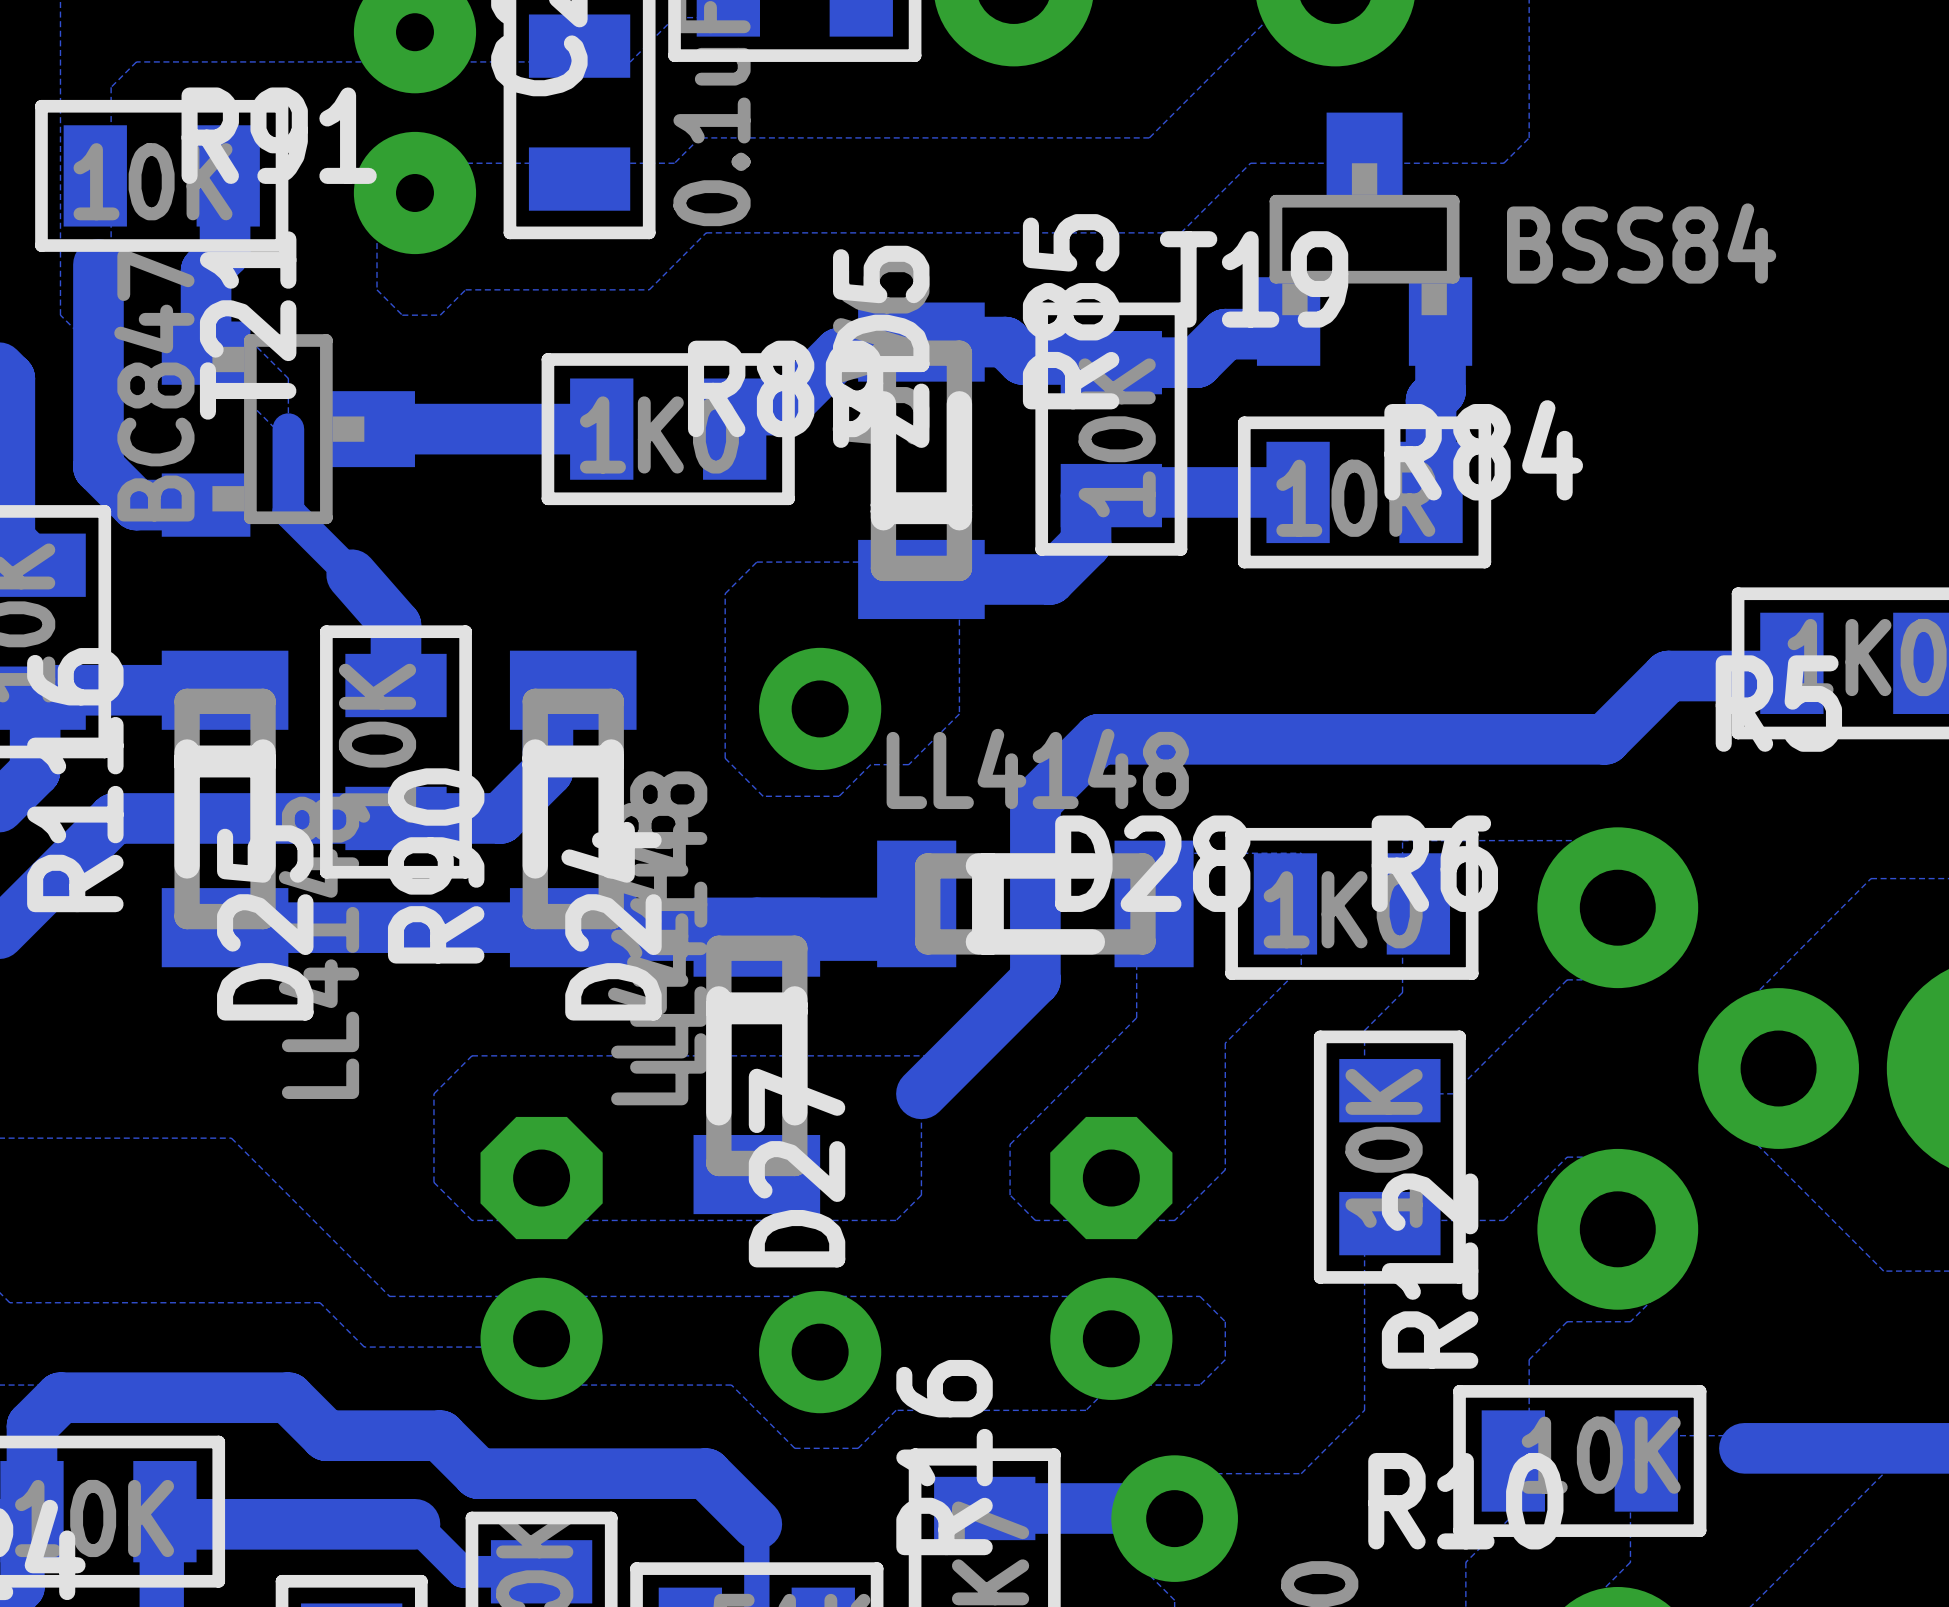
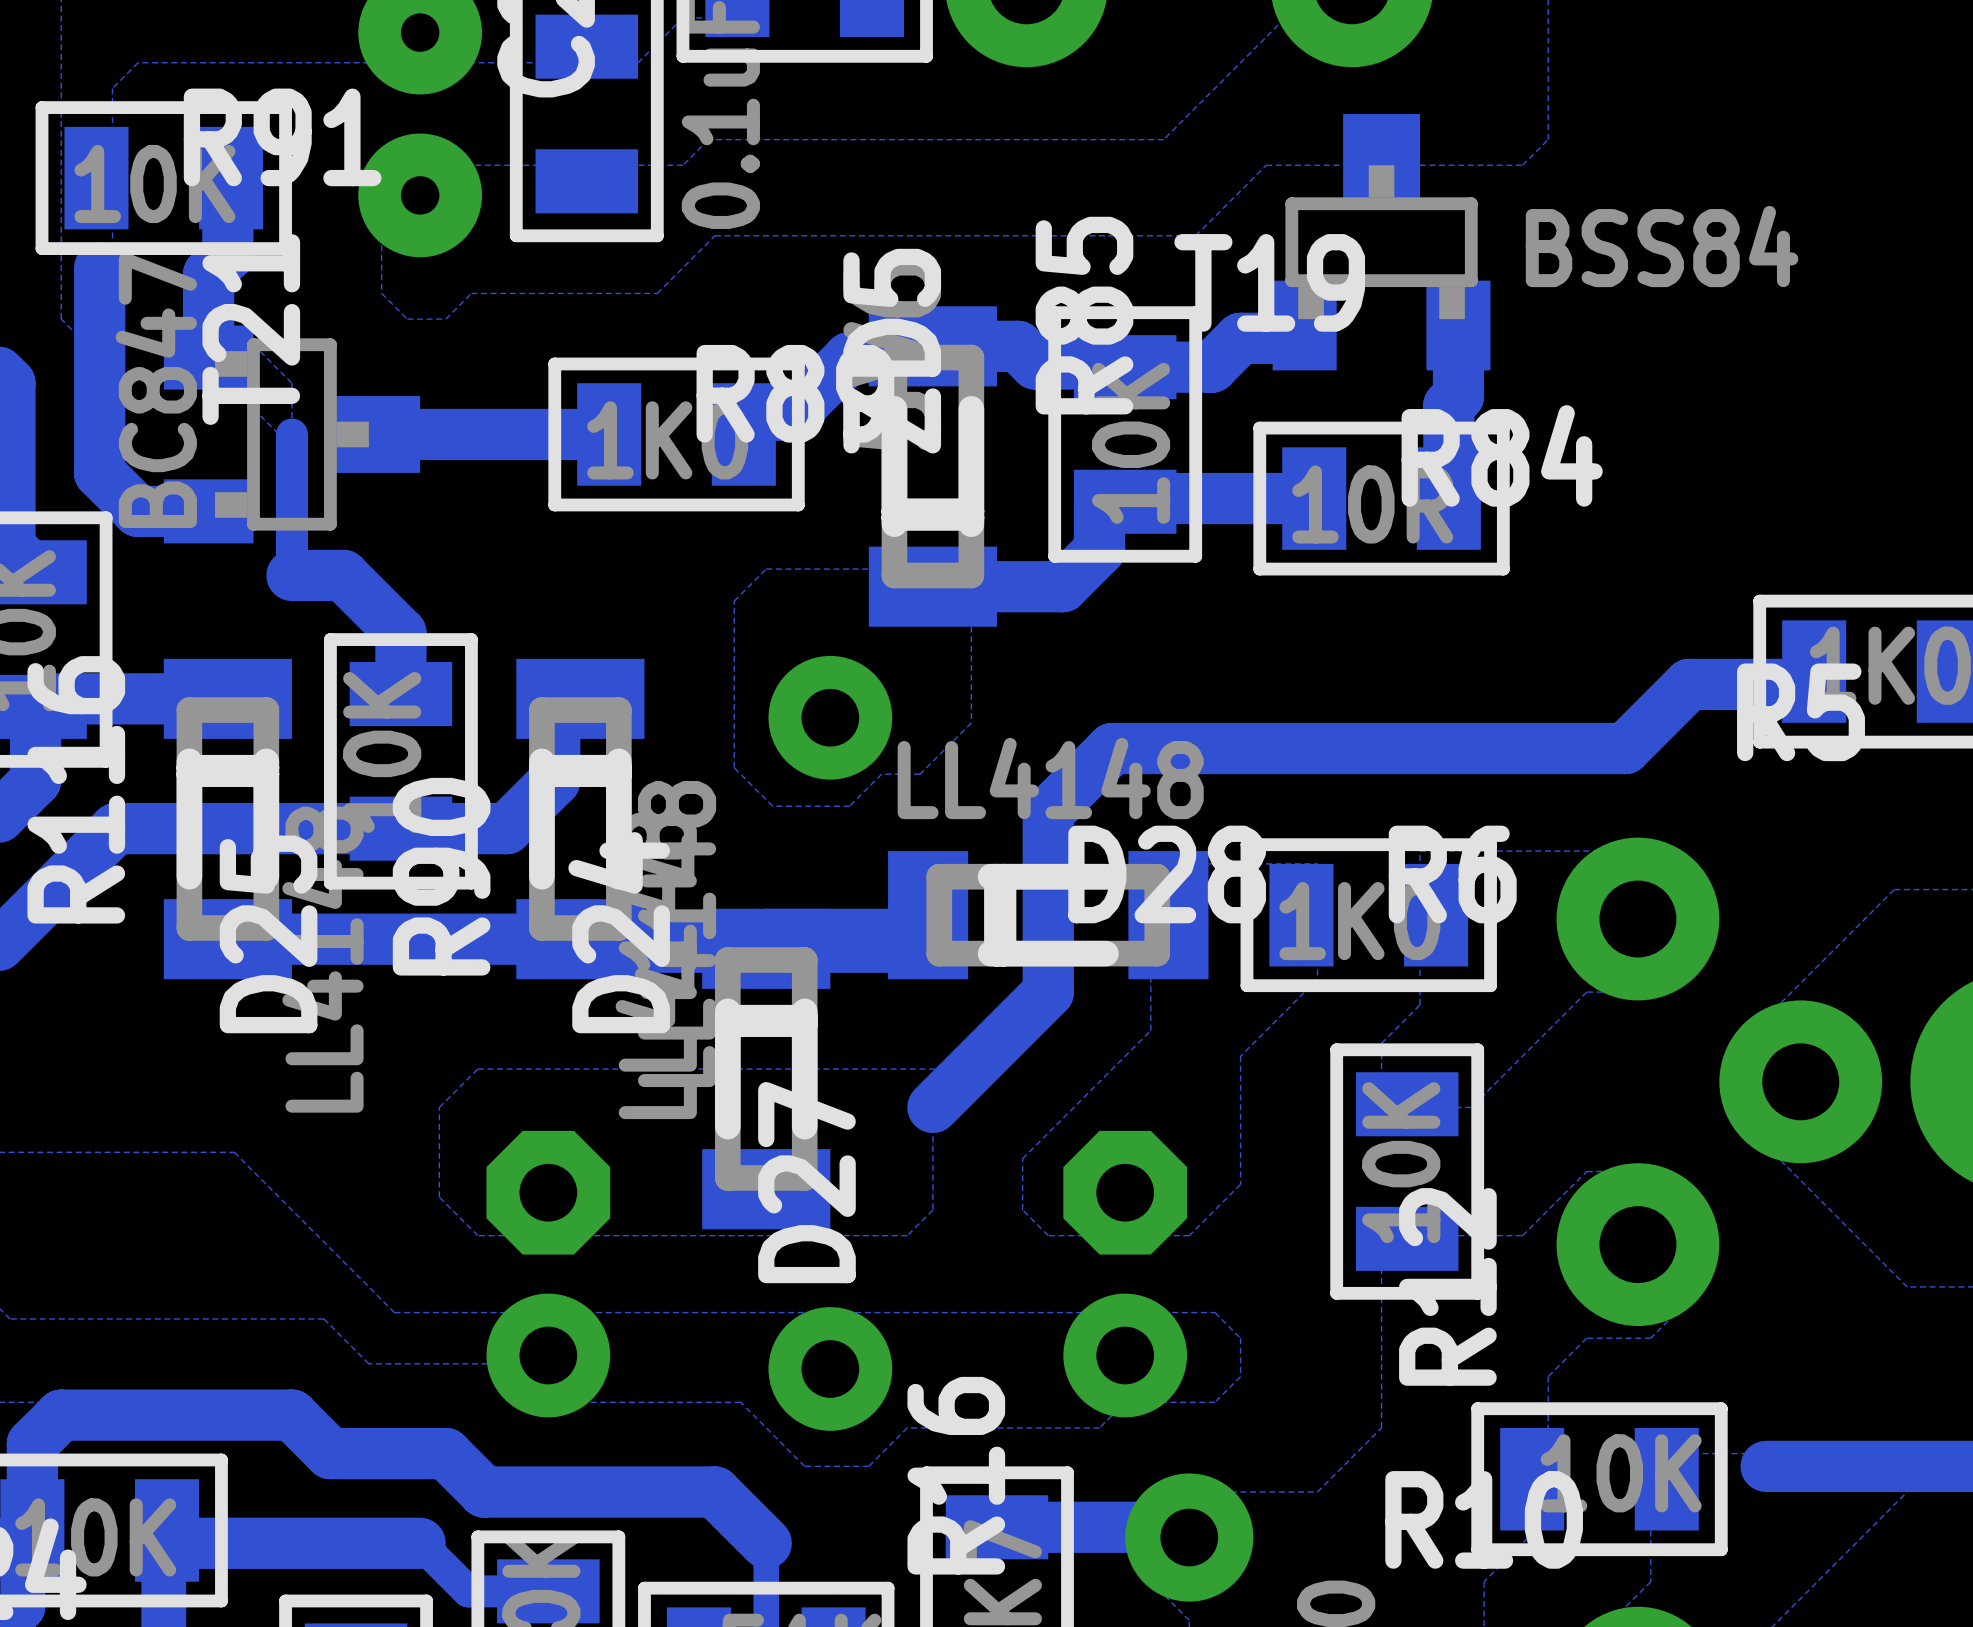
bottom track: (288, 511) (351, 574) (395, 625) -> (291, 517) (291, 575) (343, 575) (400, 633)

